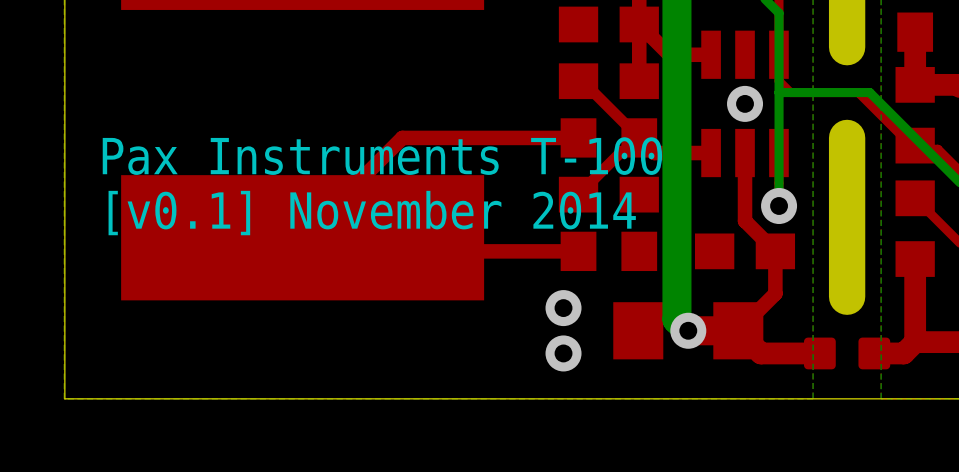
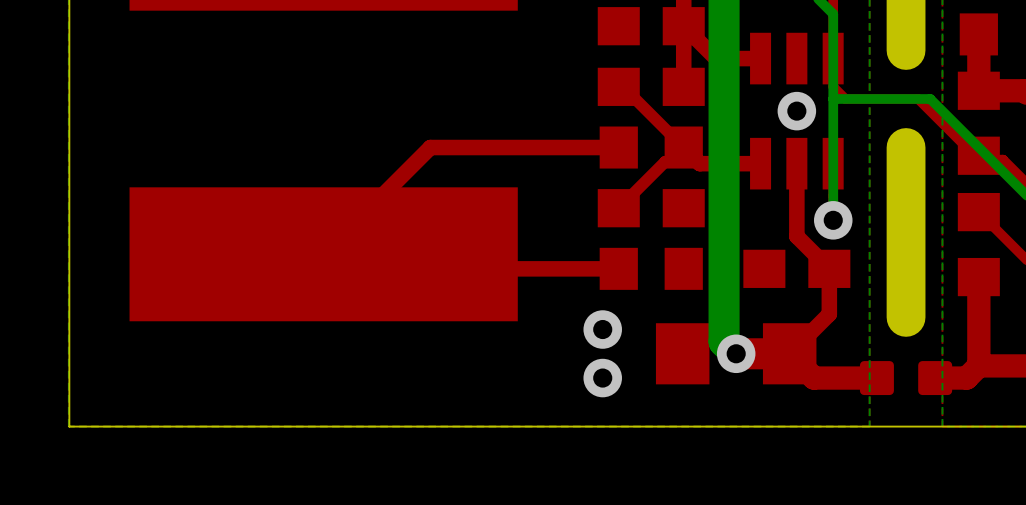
text: Pax Instruments T-100 (382, 156) -> none
text: [v0.1] November 2014 (372, 213) -> none

